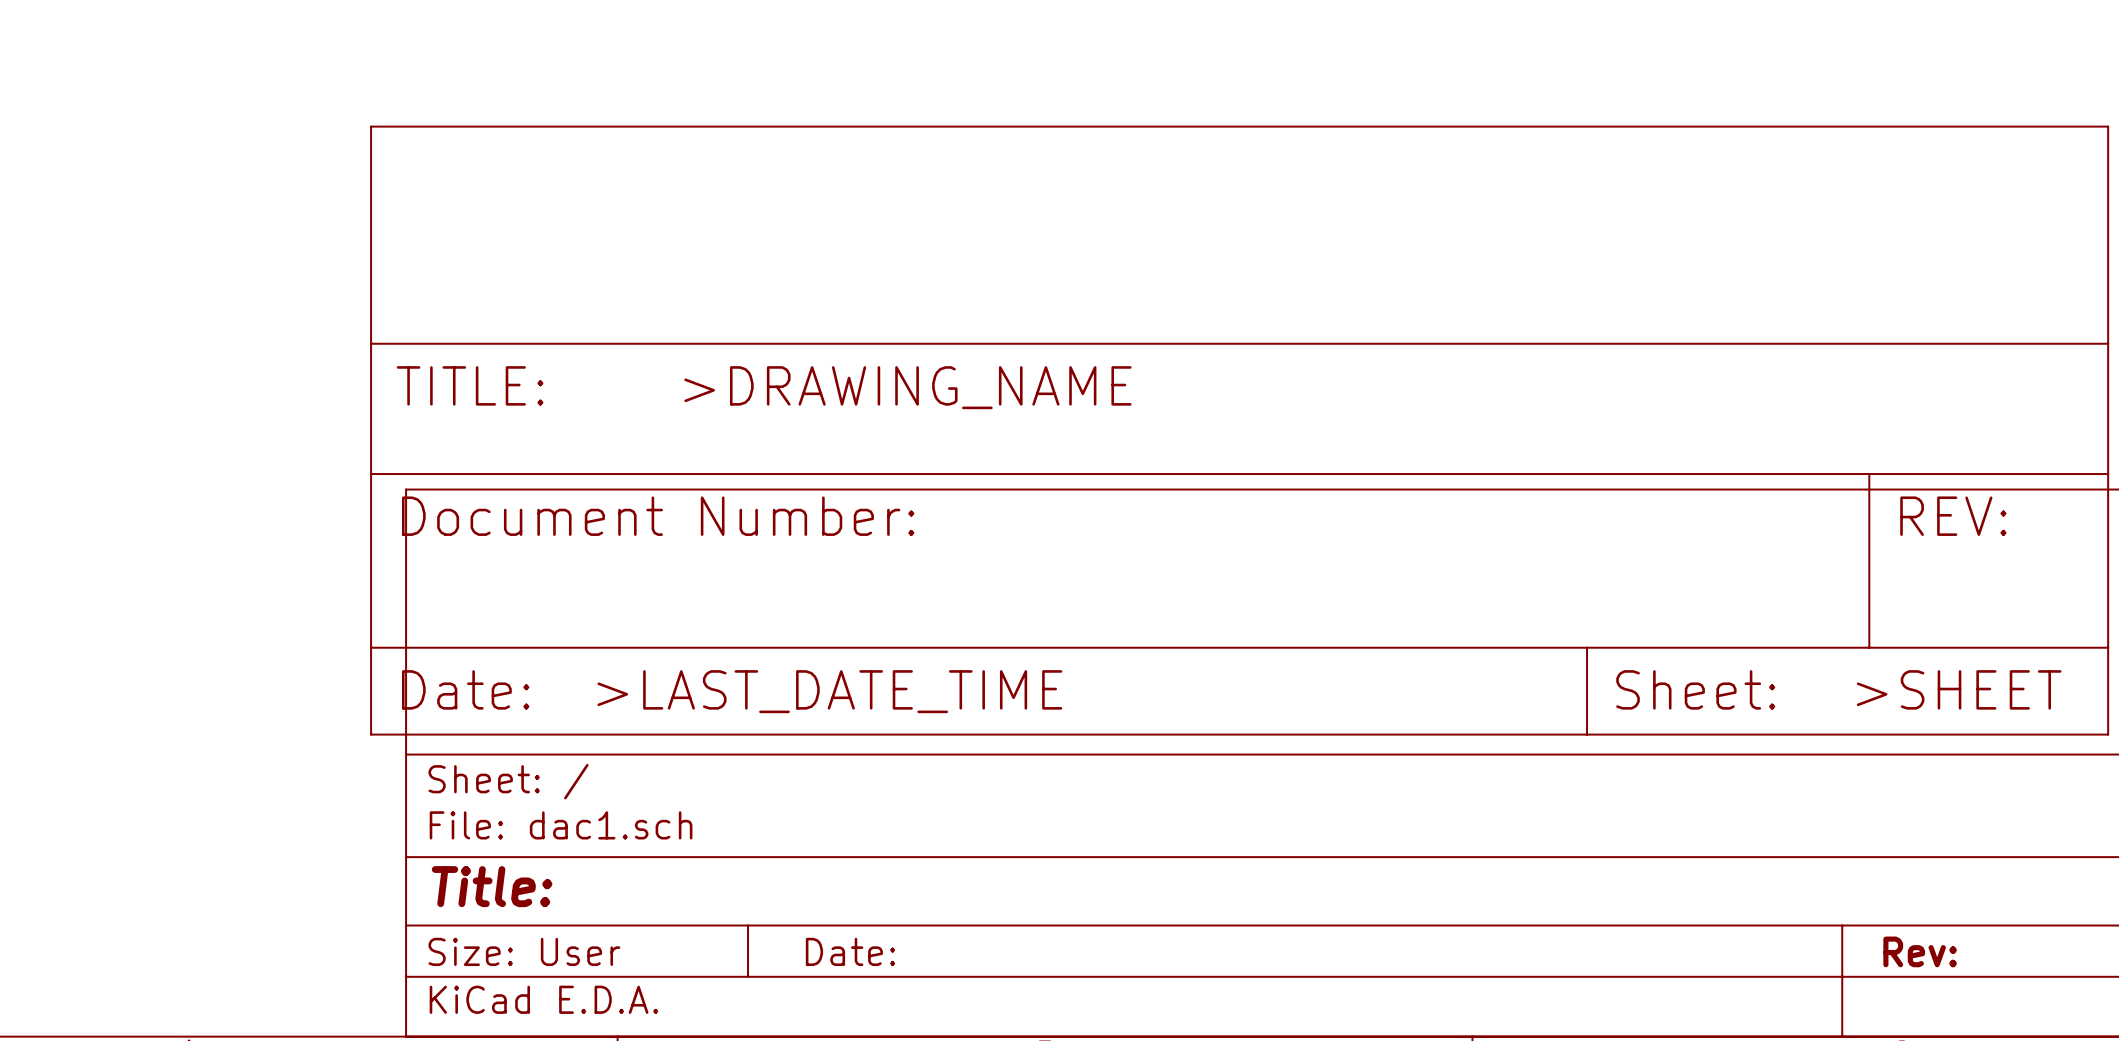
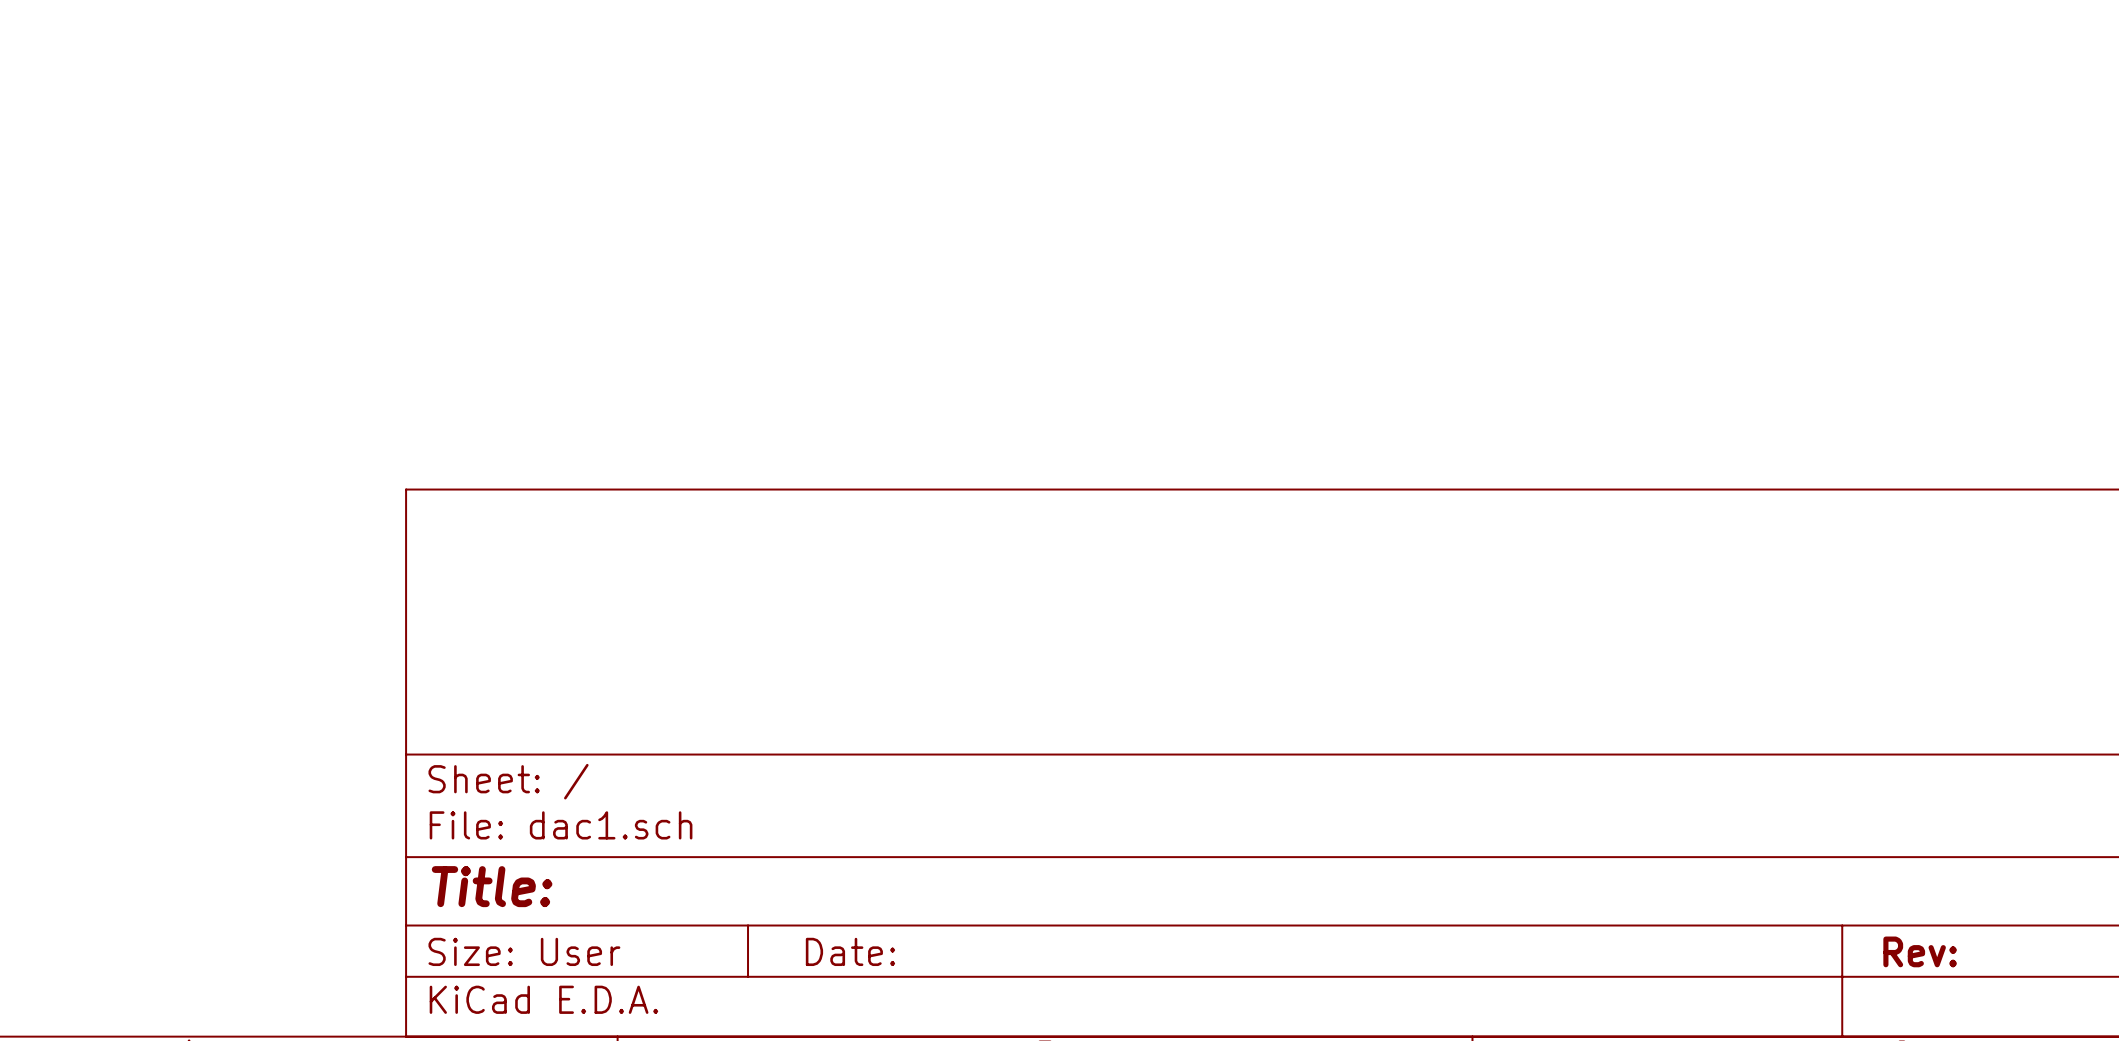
power symbol: (1239, 430) -> none

